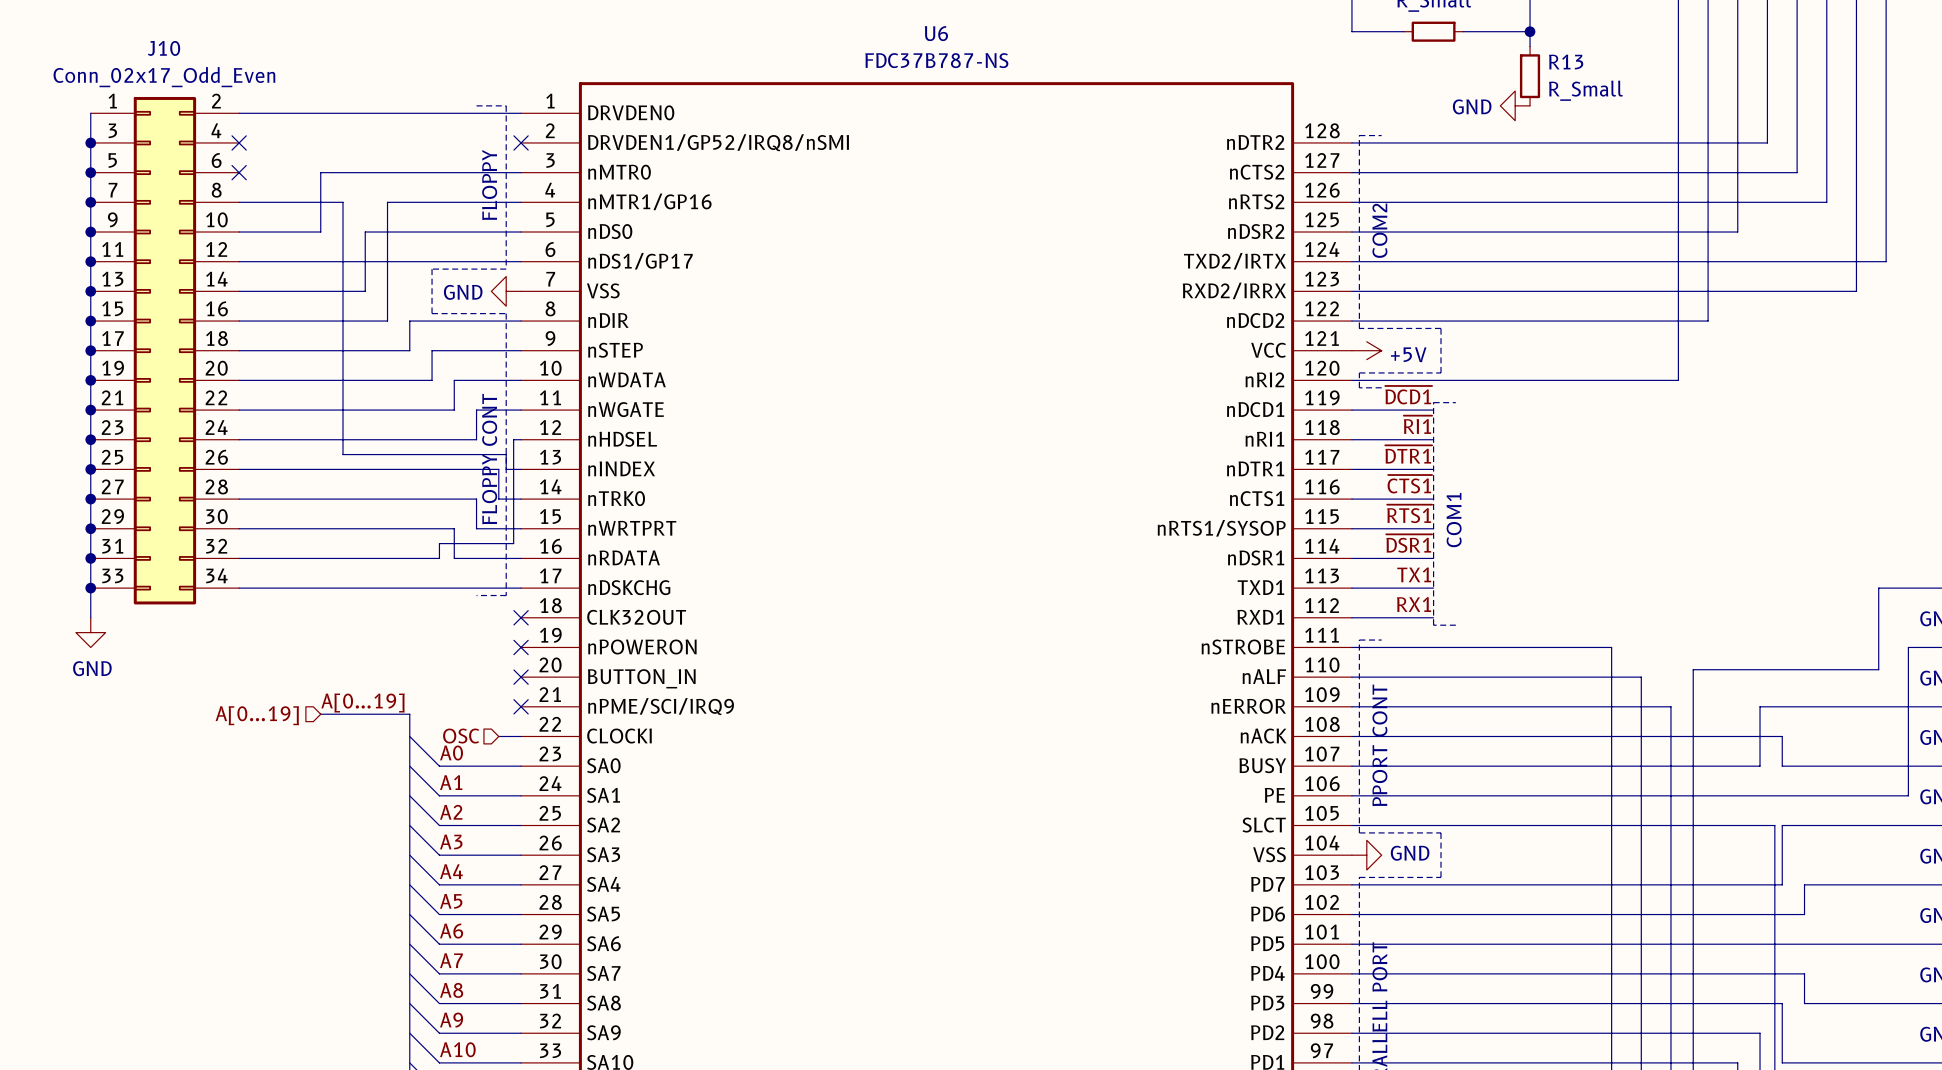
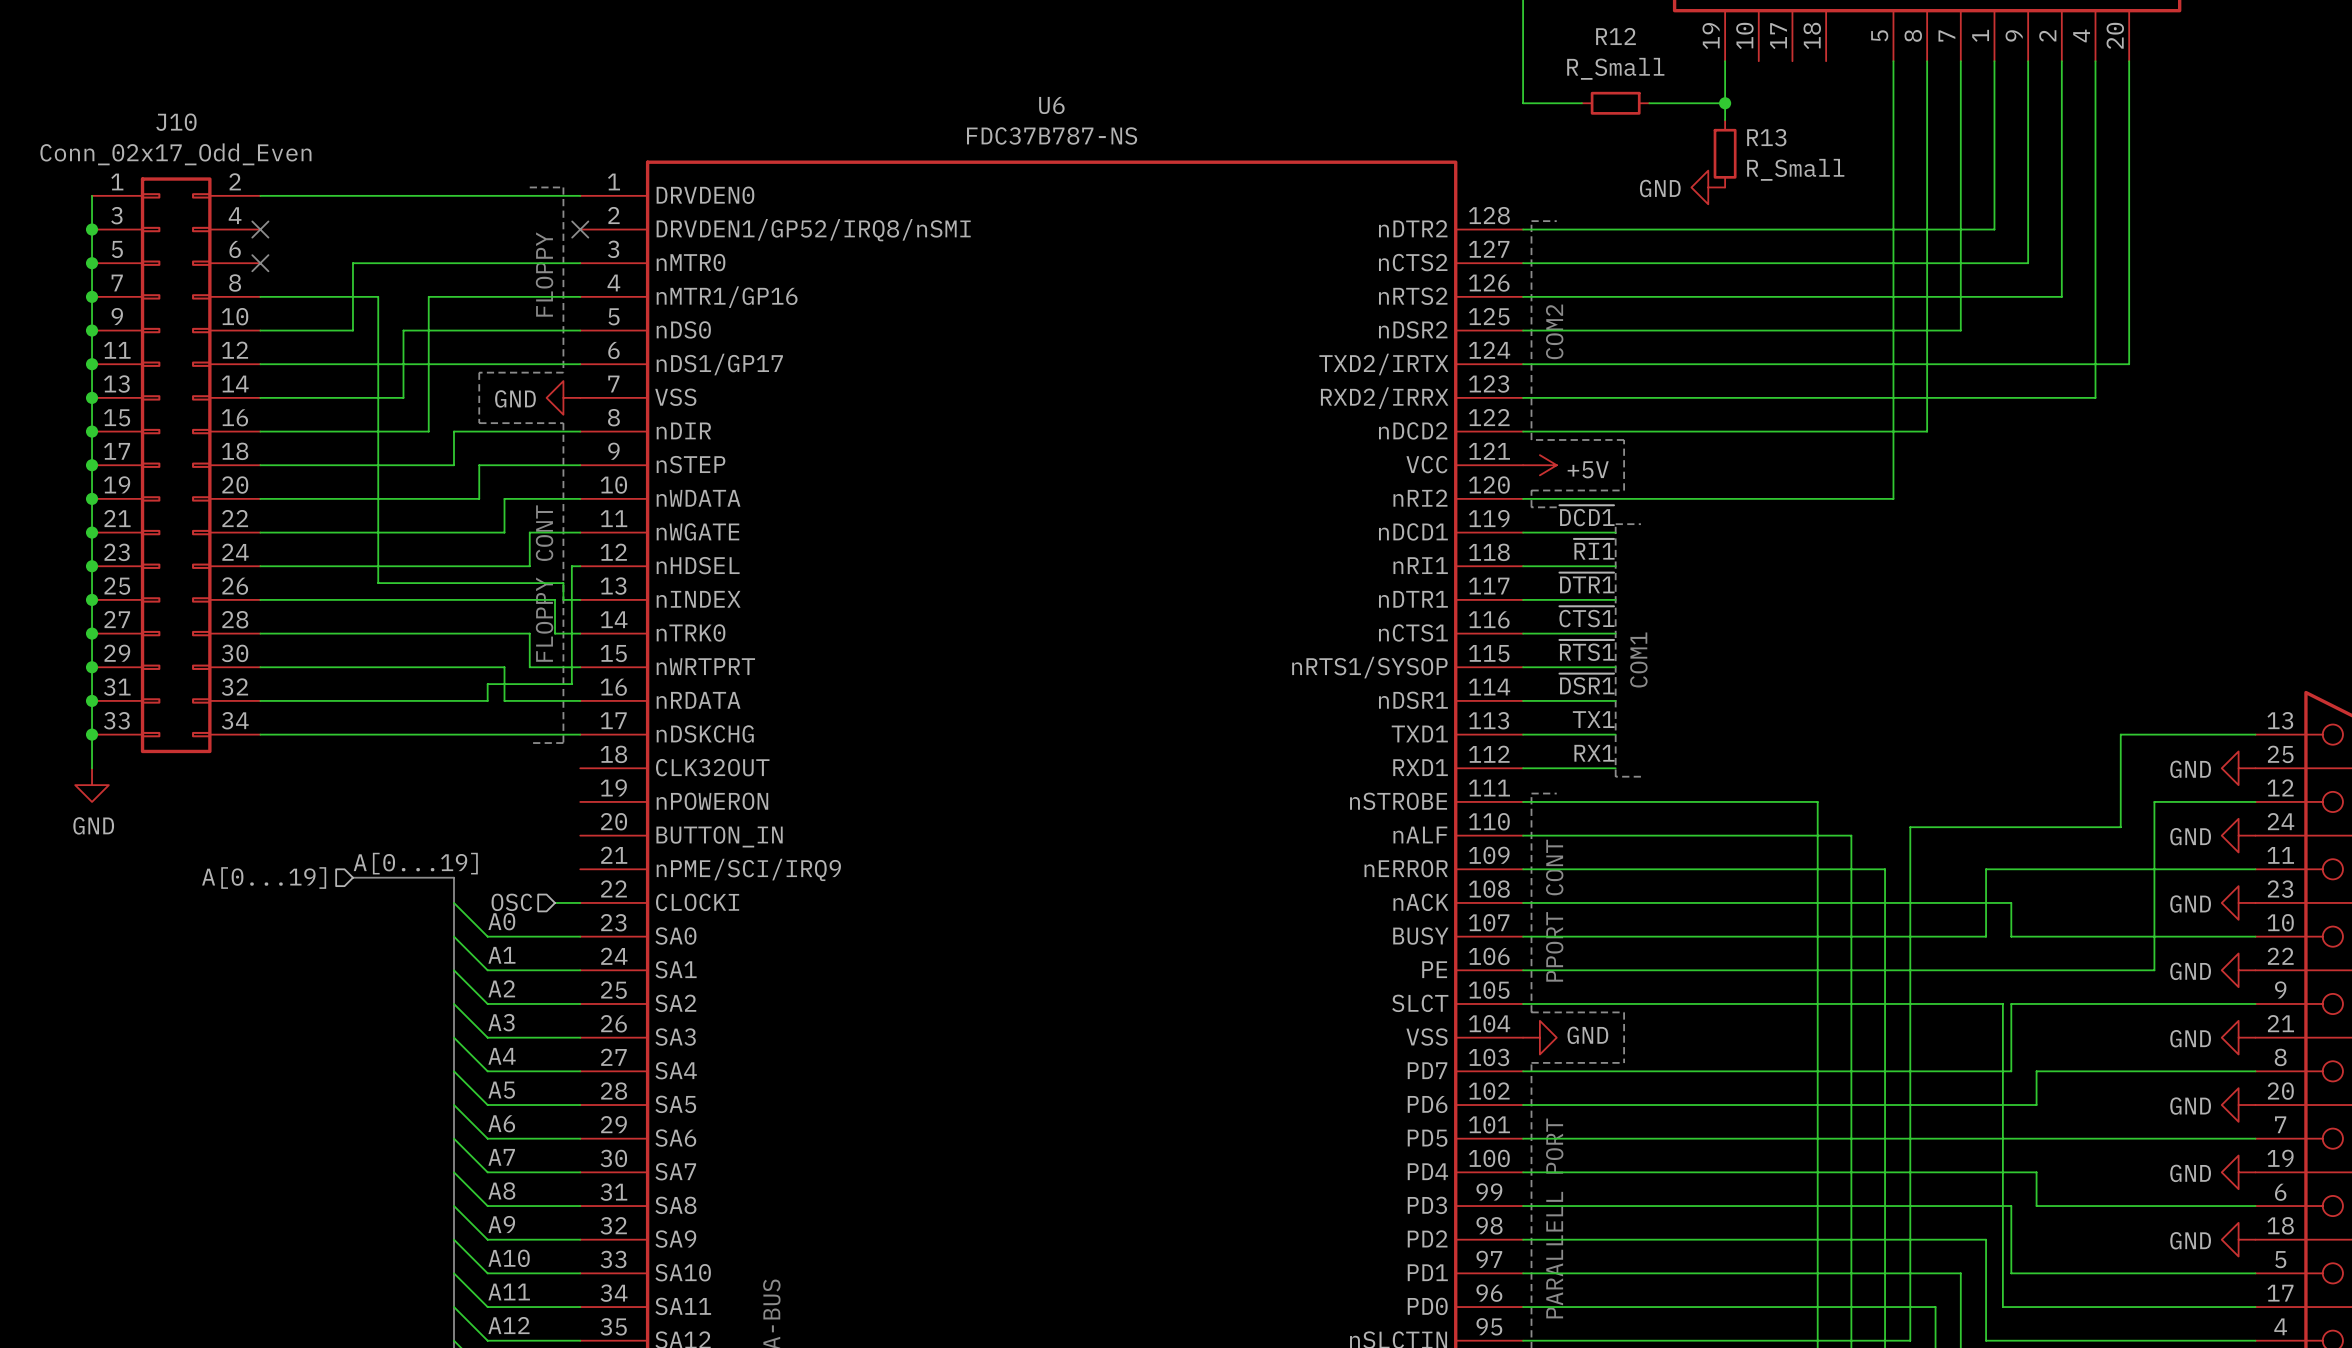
no-connect mark: (521, 617) -> none
no-connect mark: (521, 647) -> none
no-connect mark: (521, 677) -> none
no-connect mark: (521, 706) -> none

